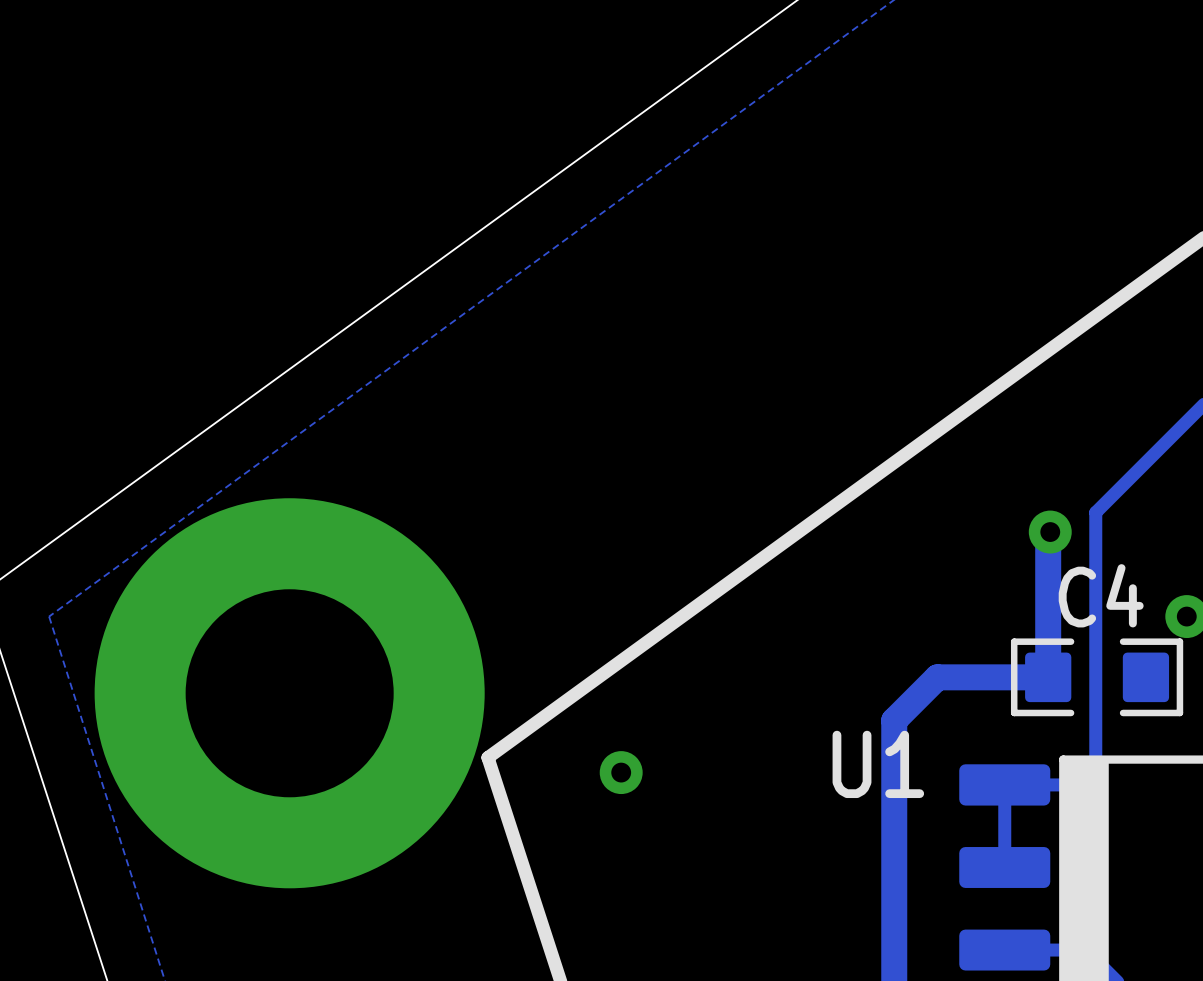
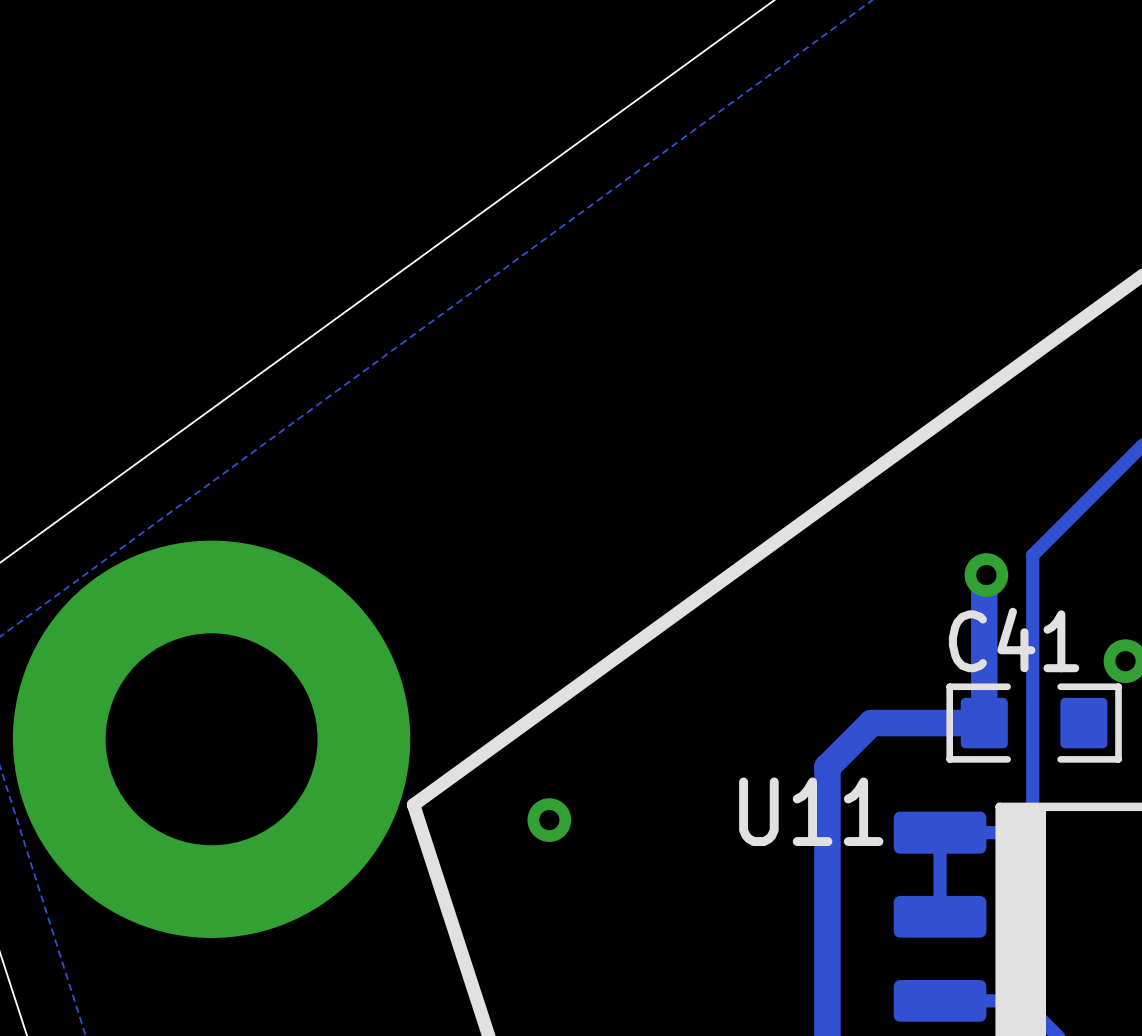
C4 name: C4 (1101, 595) -> C41 (1014, 640)
U1 name: U1 (878, 764) -> U11 (811, 811)

